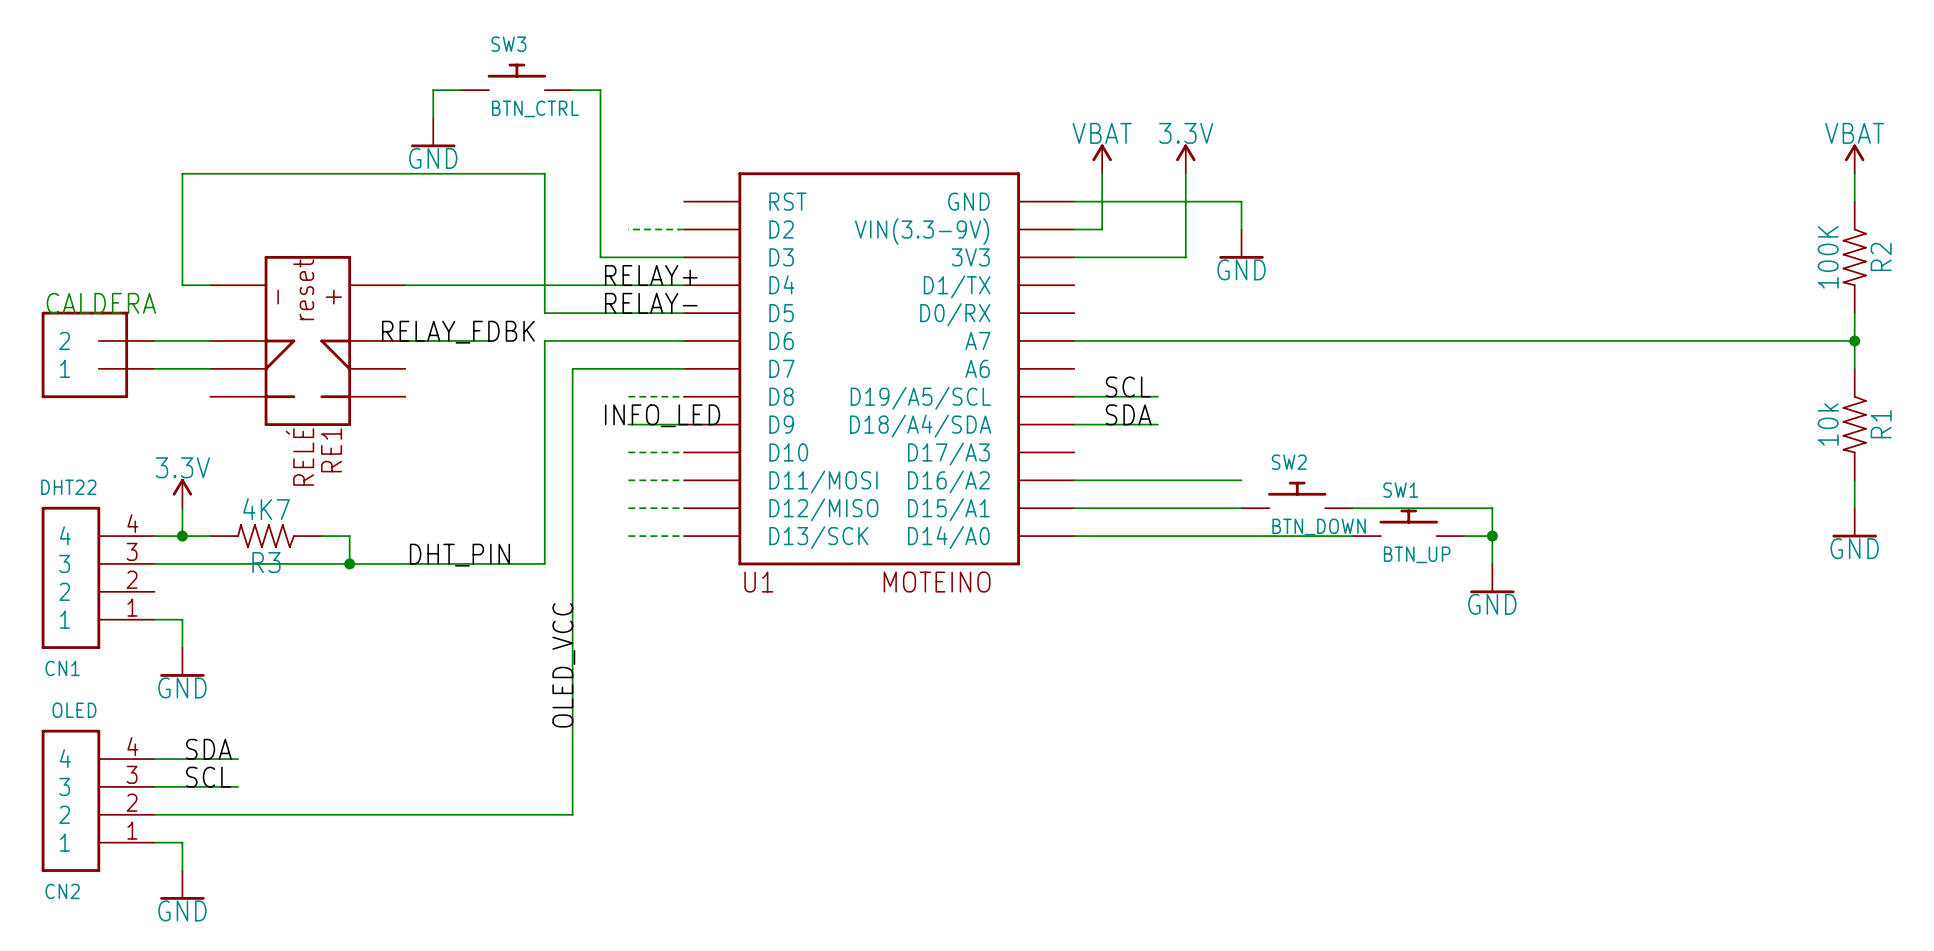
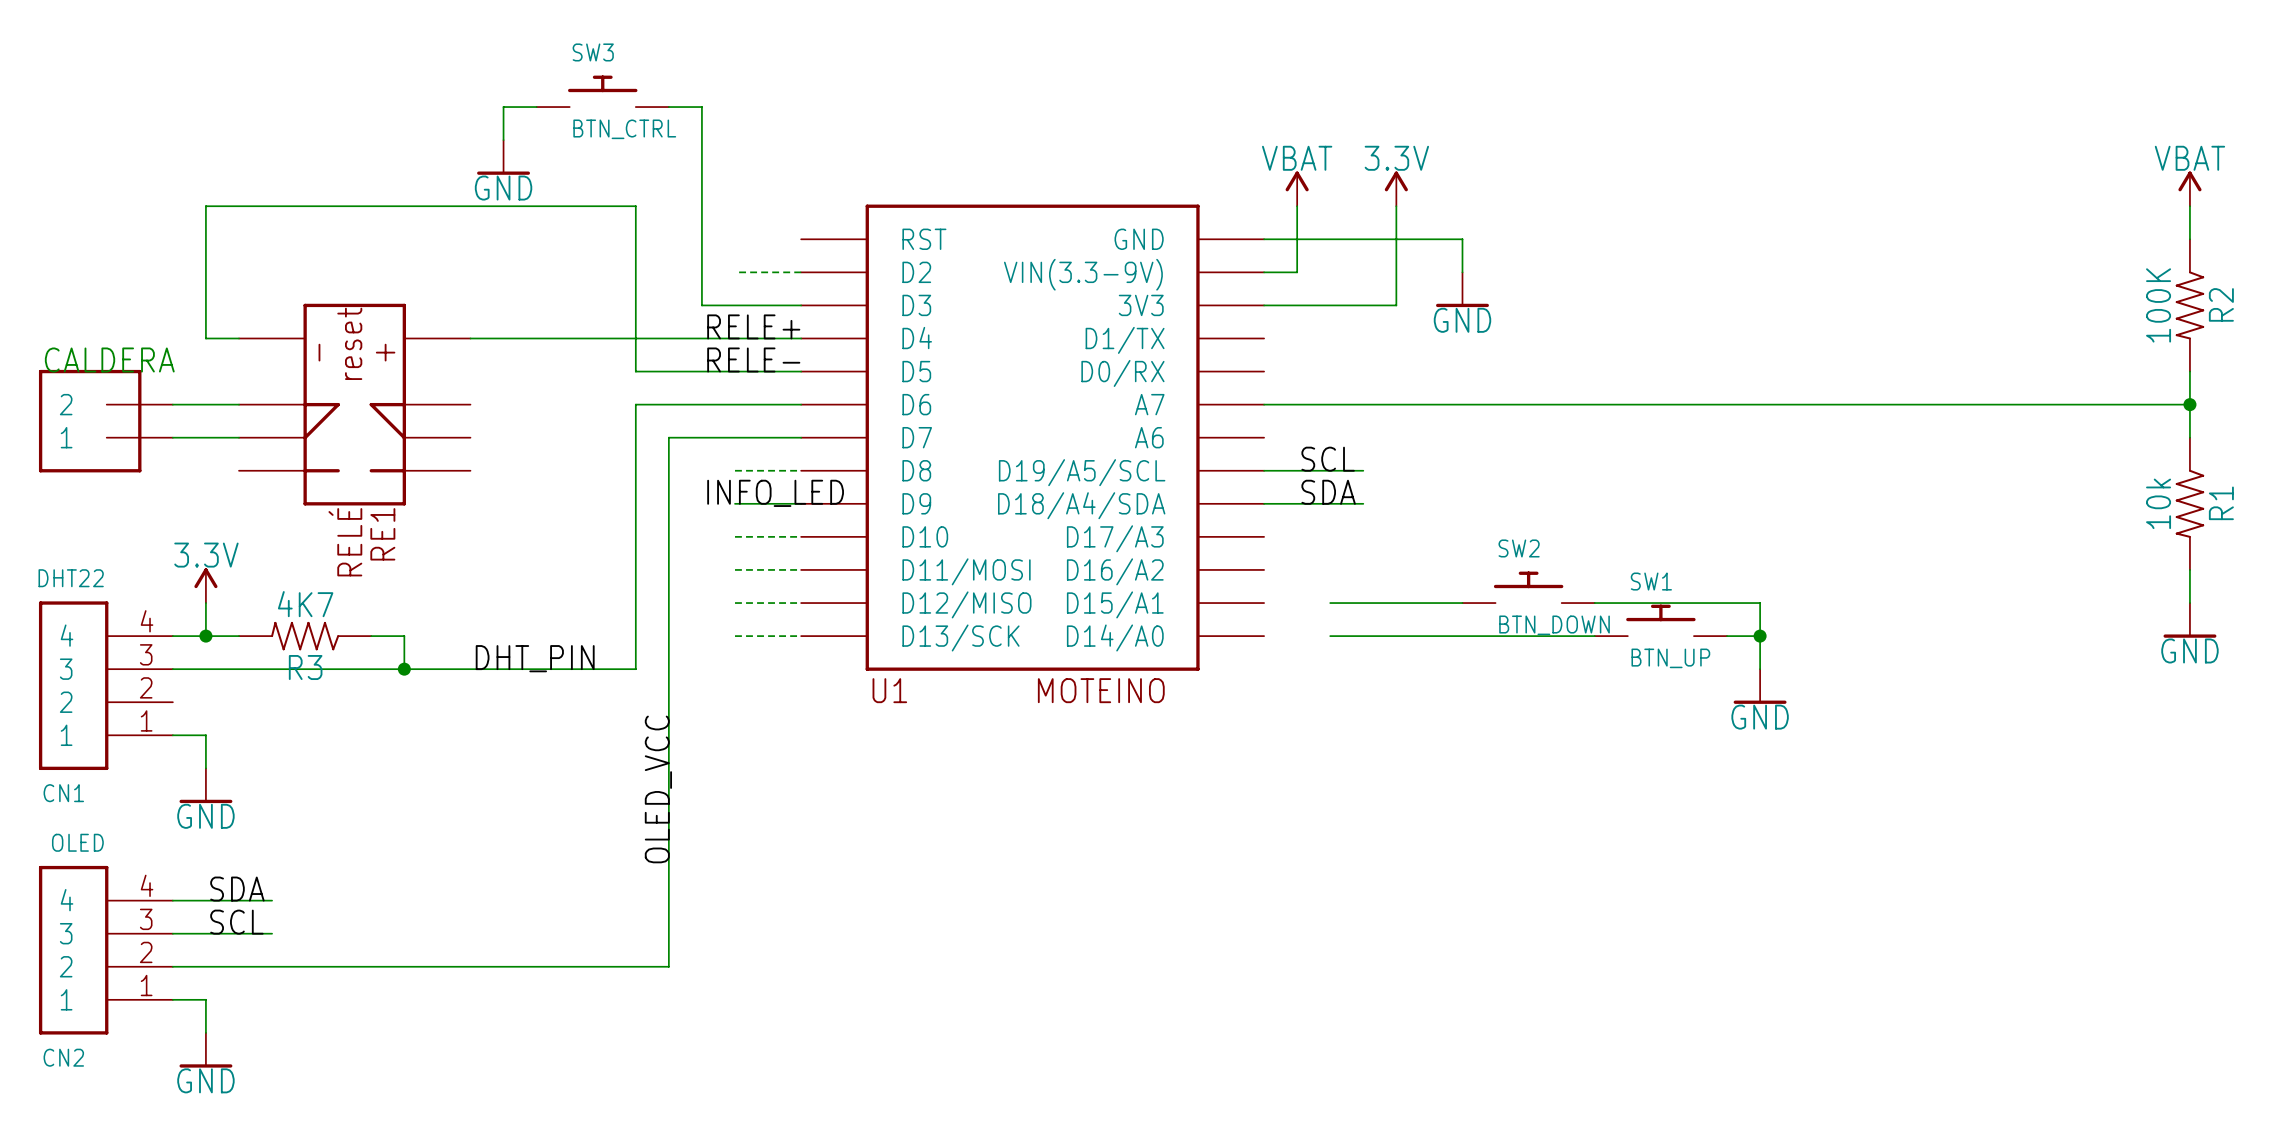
label: RELAY+ (651, 275) -> RELE+ (753, 326)
label: RELAY- (651, 303) -> RELE- (753, 359)
label: RELAY_FDBK (458, 332) -> none
wire: (405, 340) (489, 340) -> none
wire: (1074, 480) (1241, 480) -> none
wire: (1074, 508) (1130, 508) -> none
wire: (1074, 536) (1130, 536) -> none

